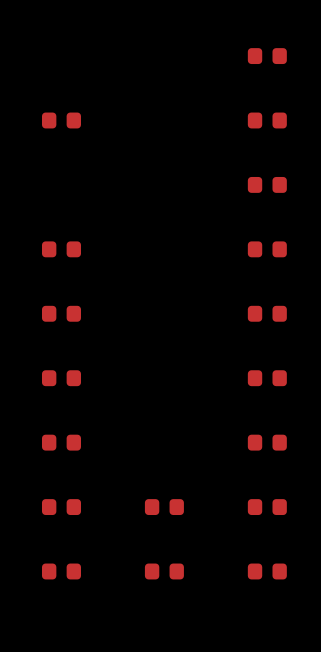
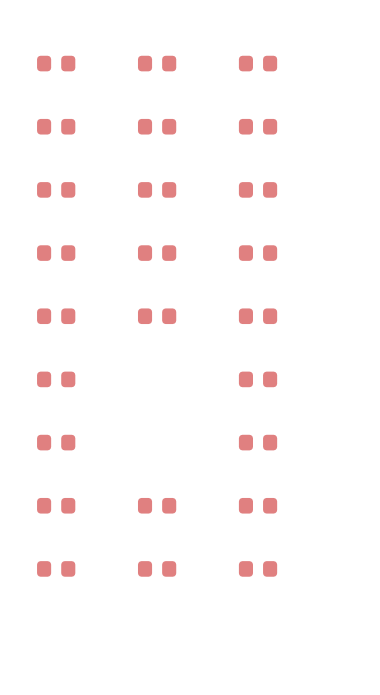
part: none -> (56, 63)
part: none -> (157, 63)
part: none -> (157, 126)
part: none -> (56, 189)
part: none -> (157, 189)
part: none -> (157, 253)
part: none -> (157, 316)

